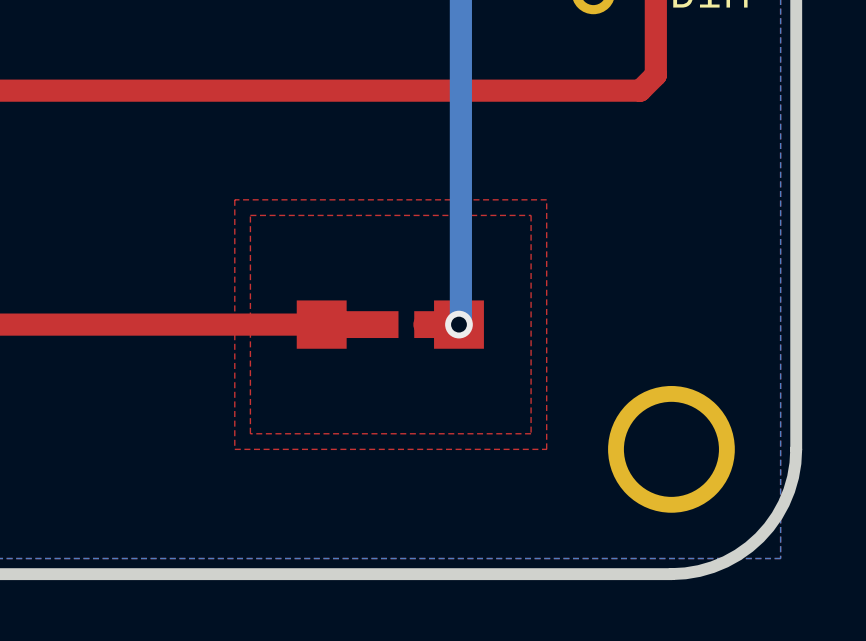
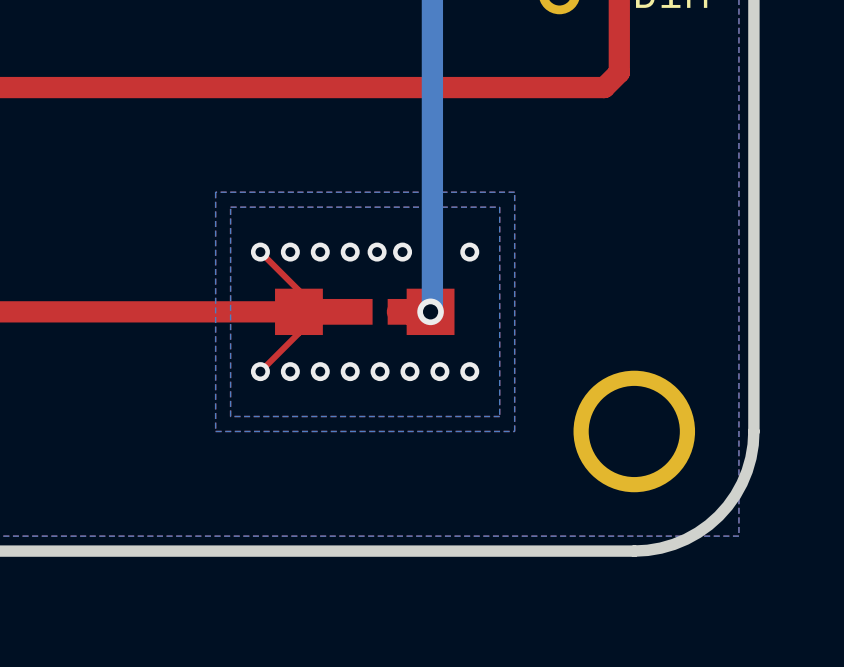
bottom zone outline: none -> (514, 192) (514, 431) (215, 431) (215, 192) (514, 192)
bottom zone outline: none -> (499, 207) (230, 207) (230, 416) (499, 416) (499, 207)
top track: none -> (260, 252) (298, 290) (298, 333) (260, 371)
via: none -> (260, 252)
via: none -> (290, 252)
via: none -> (320, 252)
via: none -> (350, 252)
via: none -> (377, 252)
via: none -> (402, 252)
via: none -> (469, 252)
via: none -> (260, 371)
via: none -> (290, 371)
via: none -> (320, 371)
via: none -> (350, 371)
via: none -> (380, 371)
via: none -> (409, 371)
via: none -> (439, 371)
via: none -> (469, 371)

